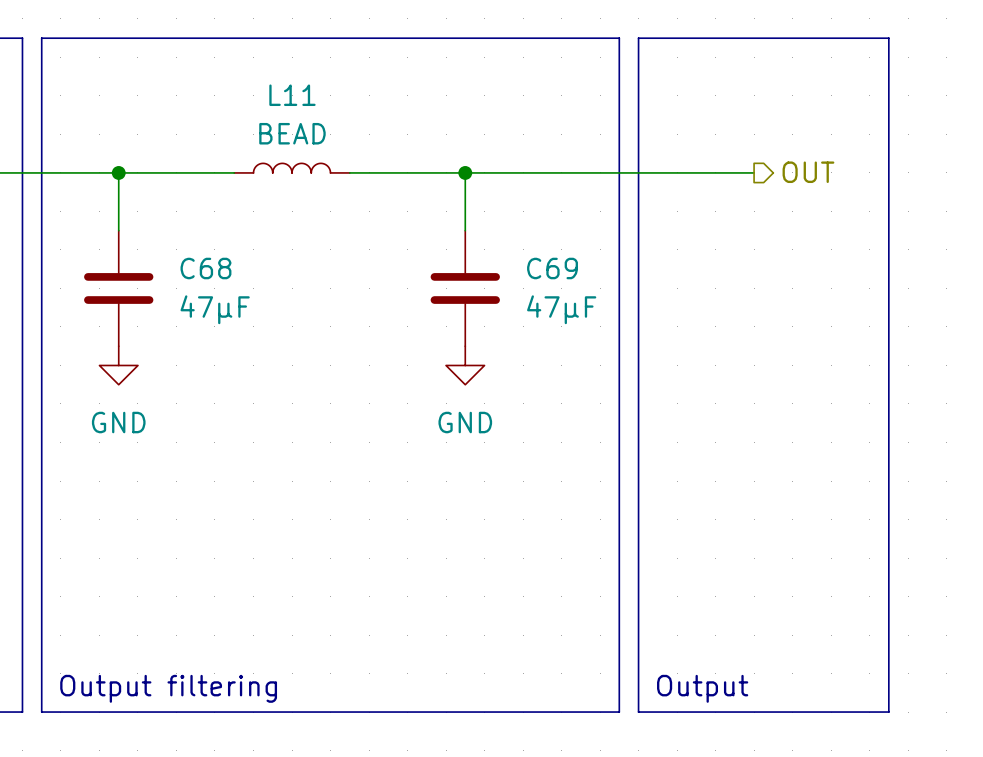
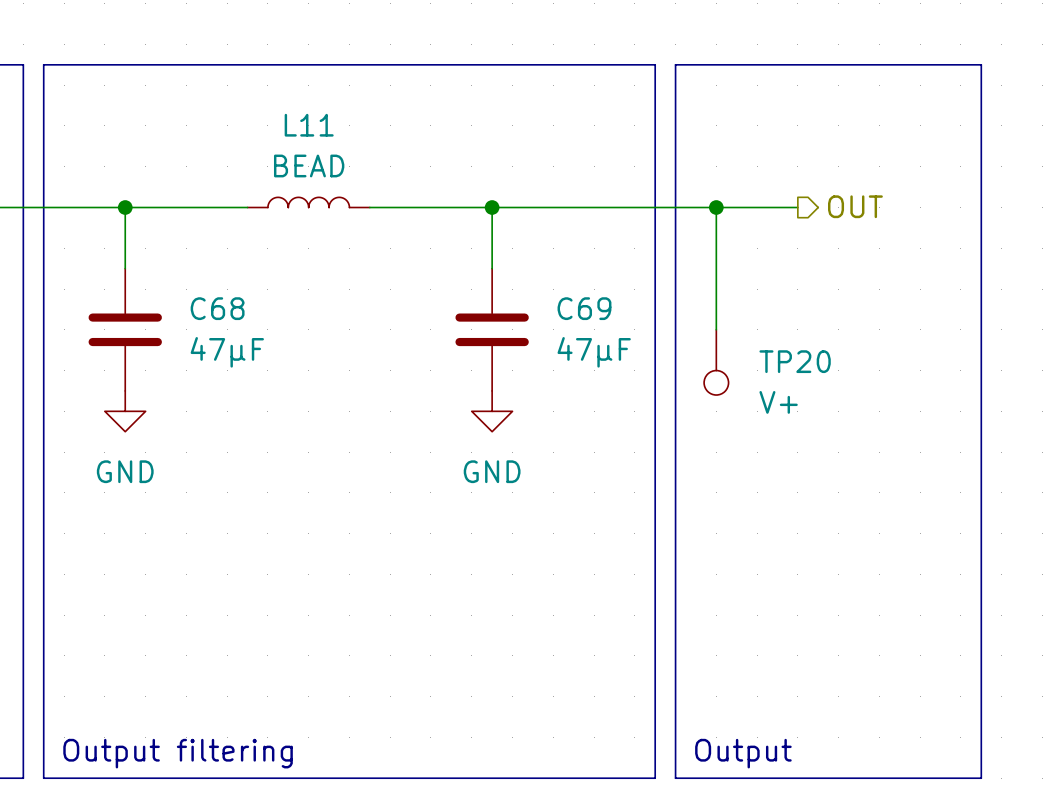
line: (888, 38) (888, 712) -> (940, 64) (981, 64) (981, 778) (940, 778)
wire: none -> (716, 207) (716, 329)
junction: none -> (716, 207)
TP20: none -> V+ (716, 362)

